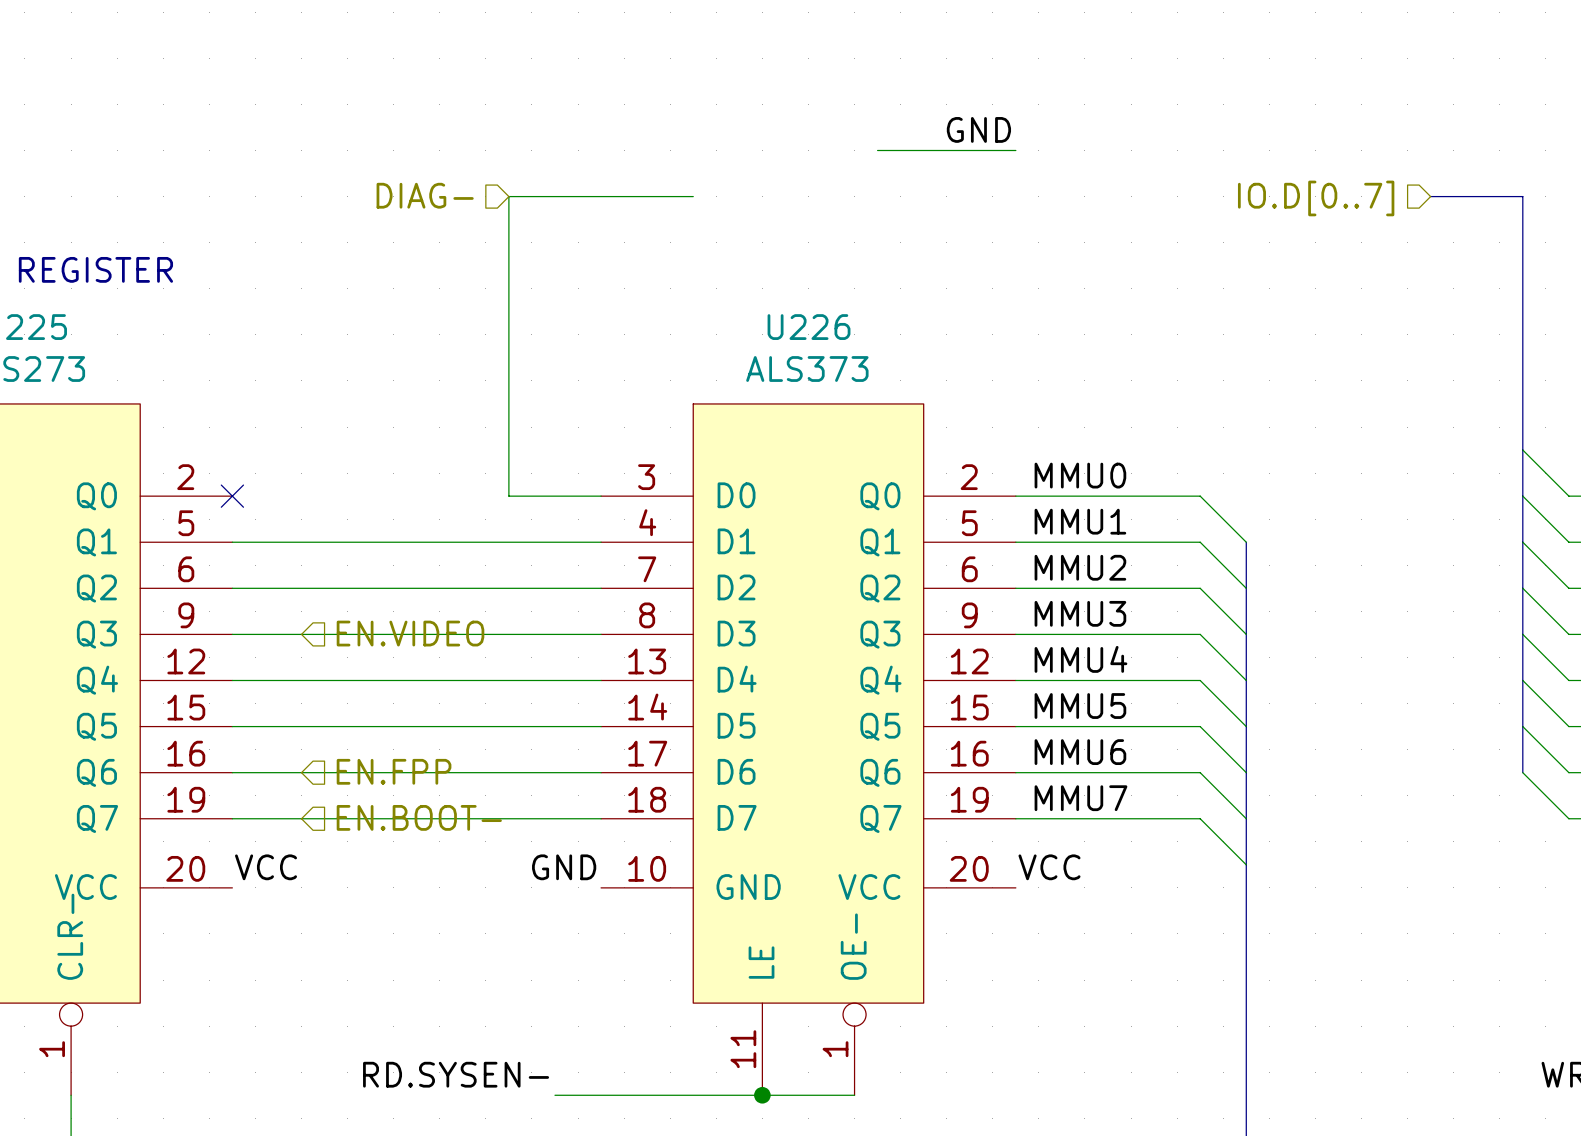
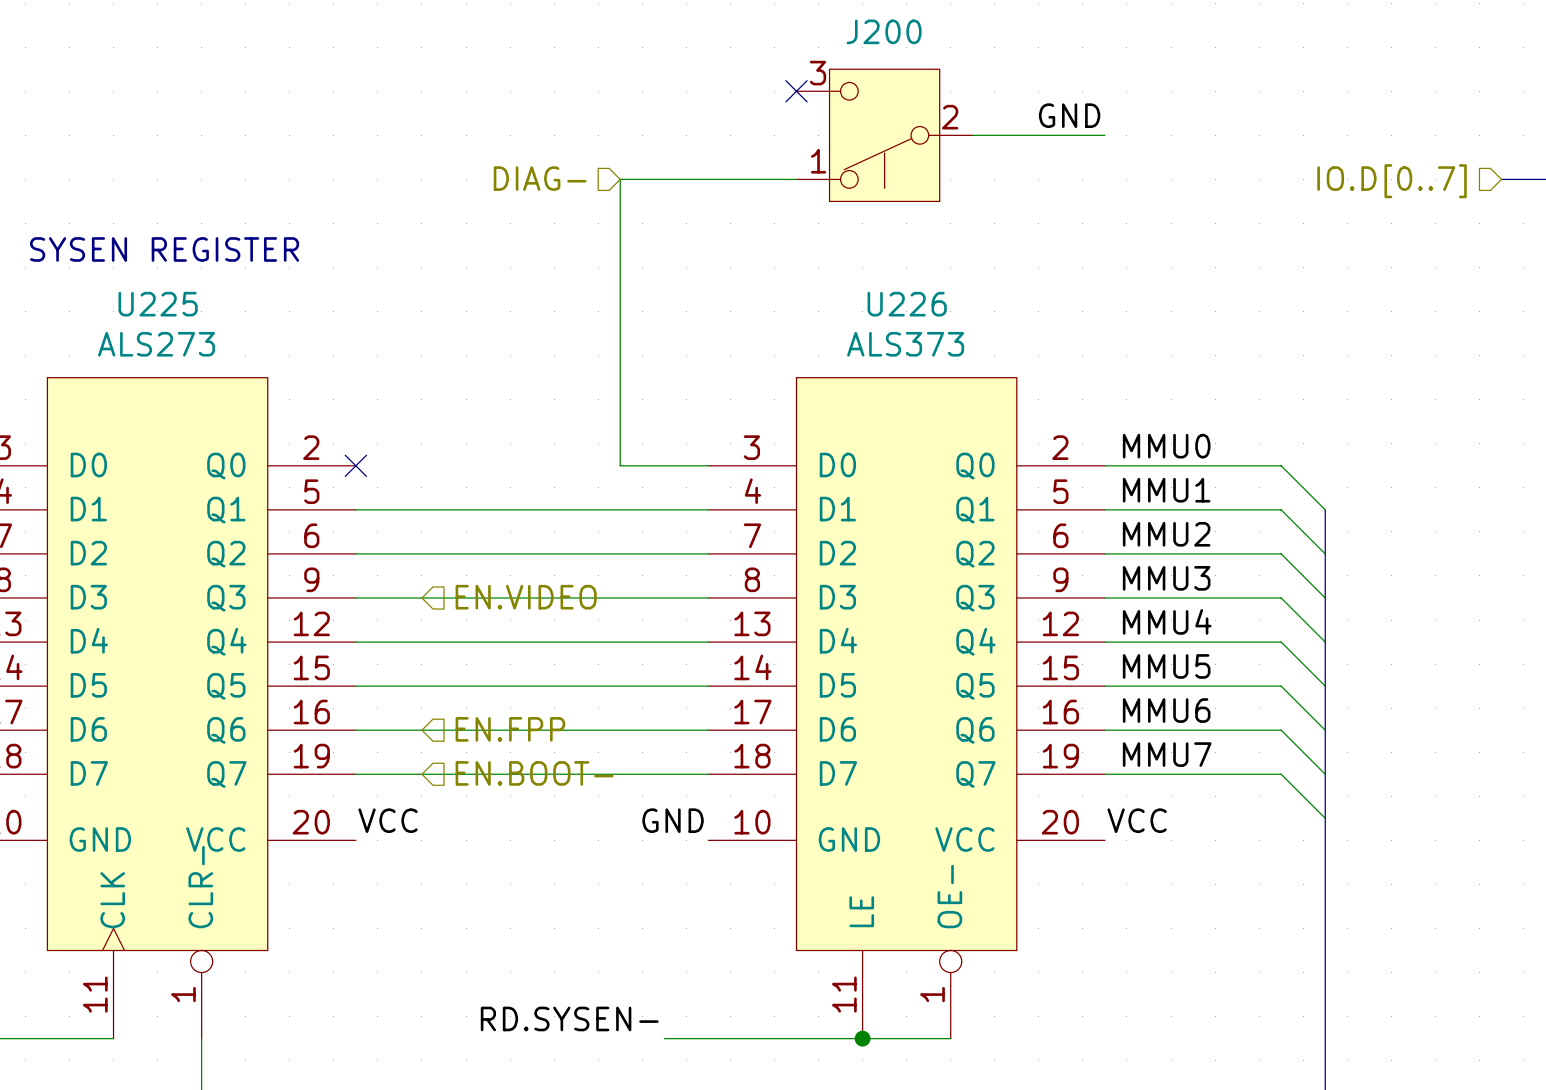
no-connect mark: none -> (796, 91)
J200: none -> (884, 135)

